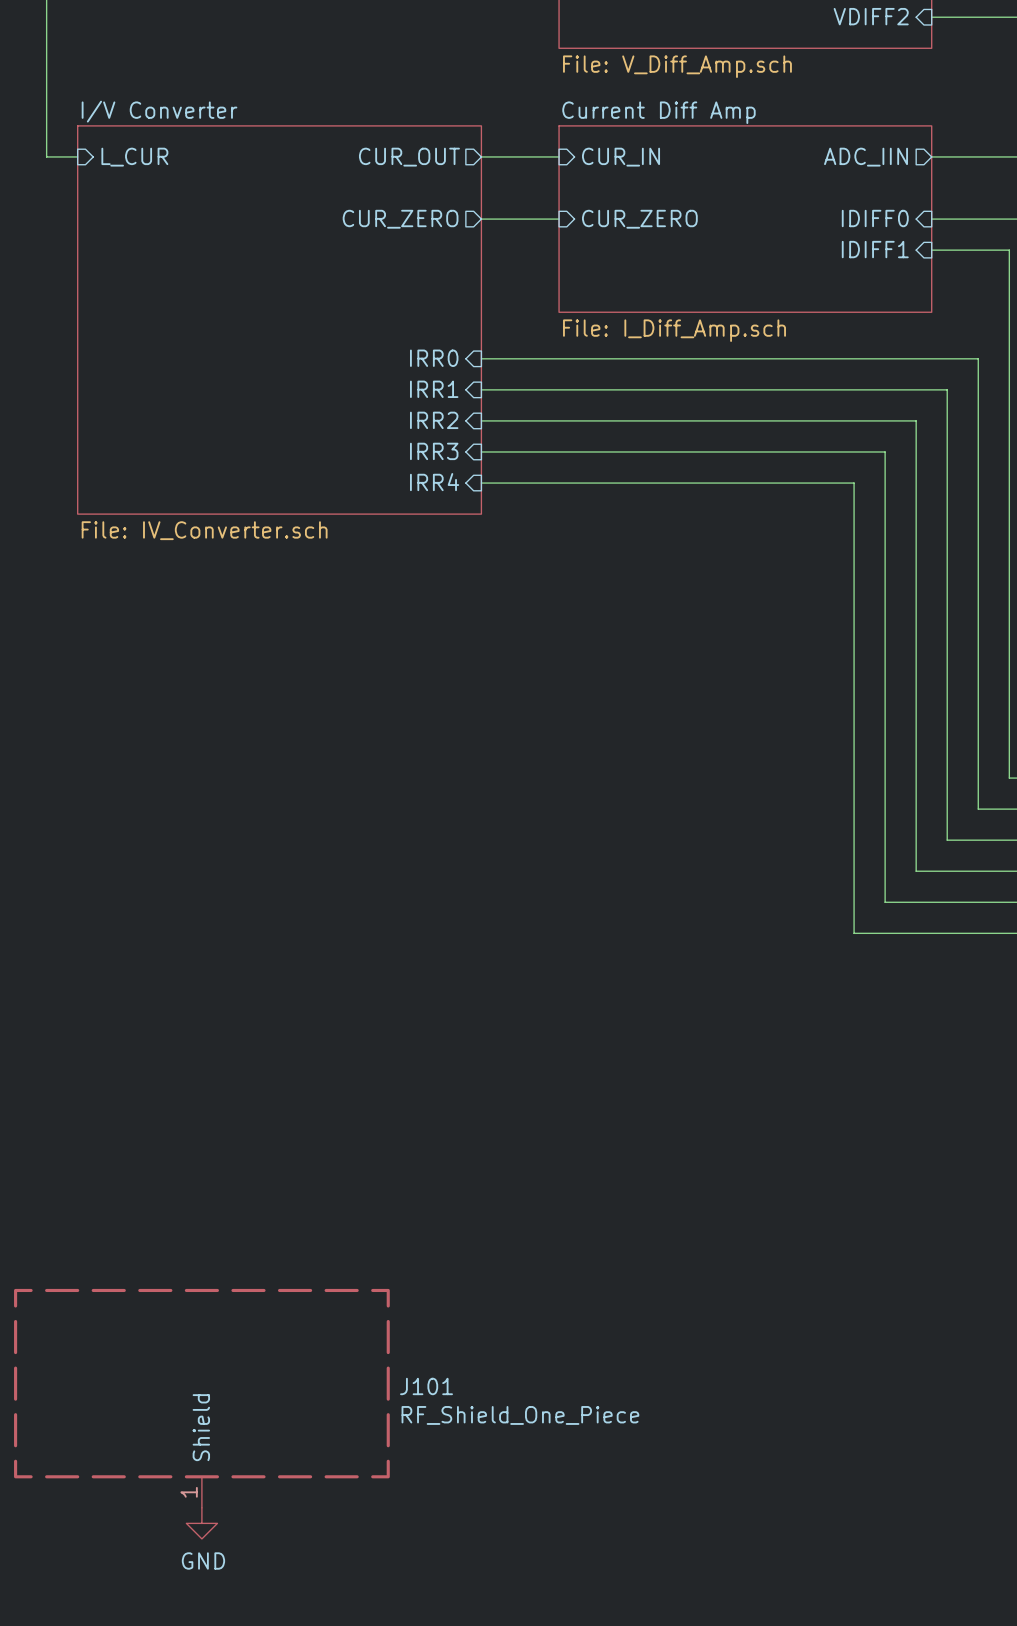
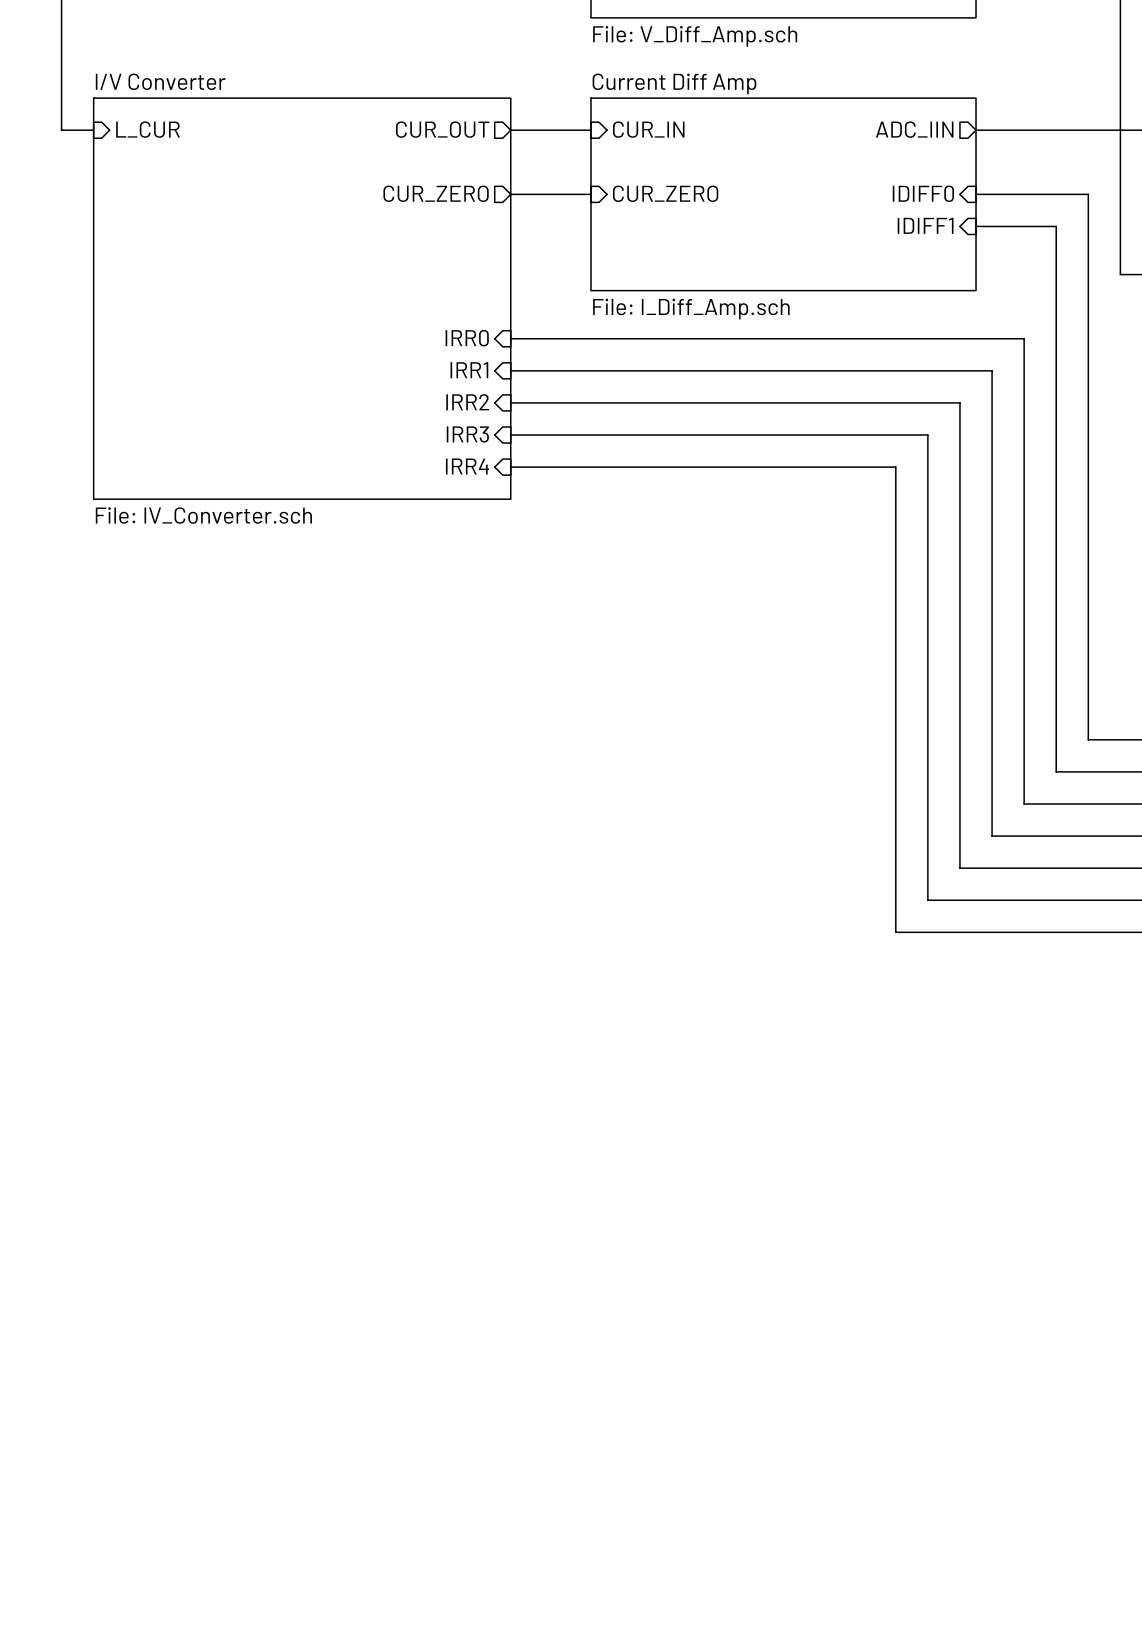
J101: RF_Shield_One_Piece (201, 1398) -> none
power symbol: GND (201, 1523) -> none

